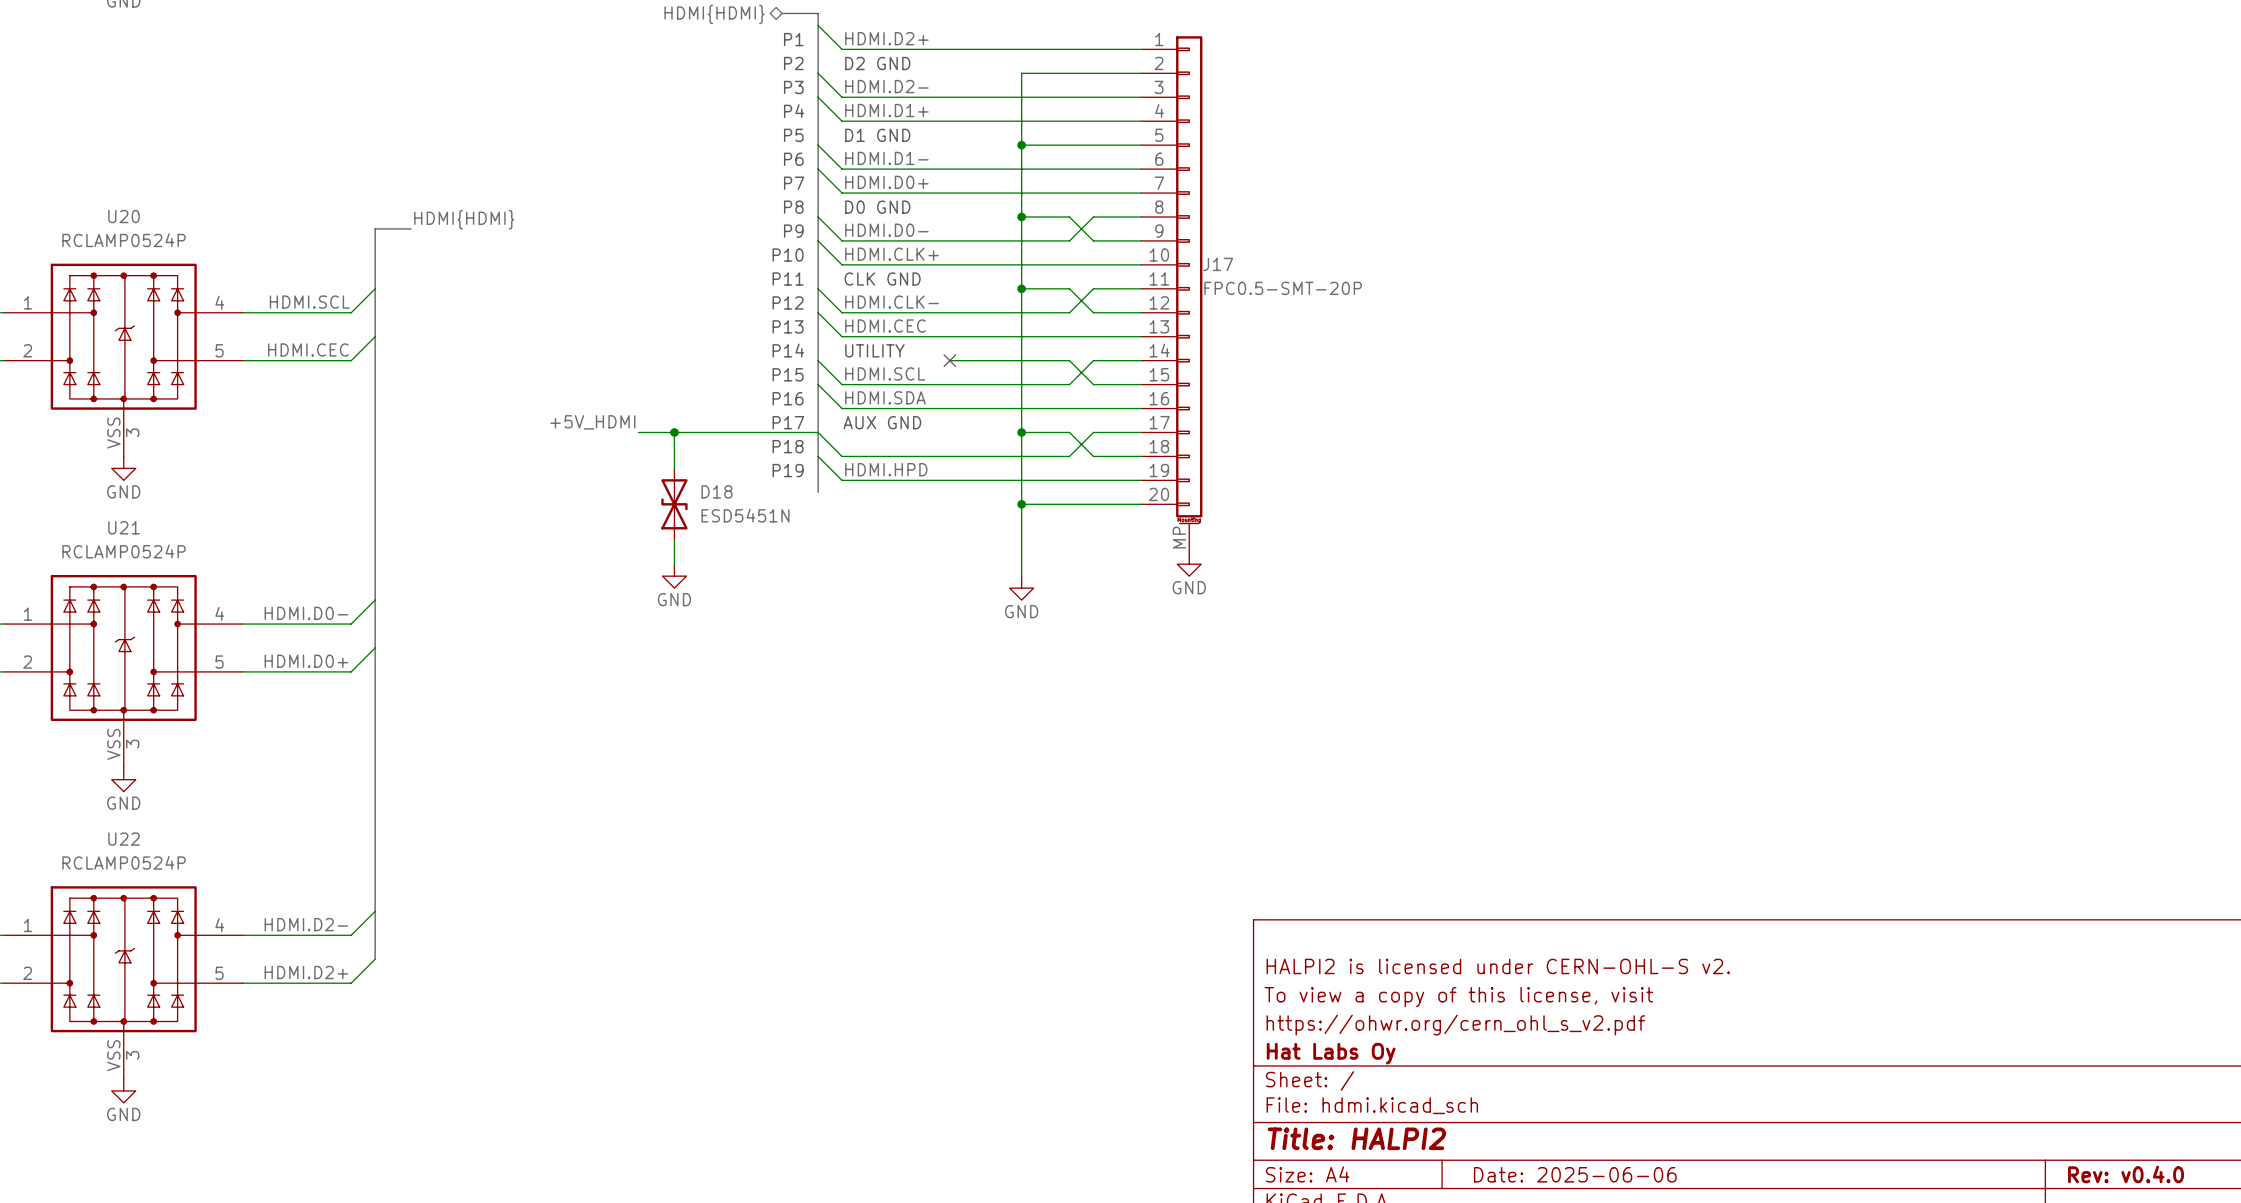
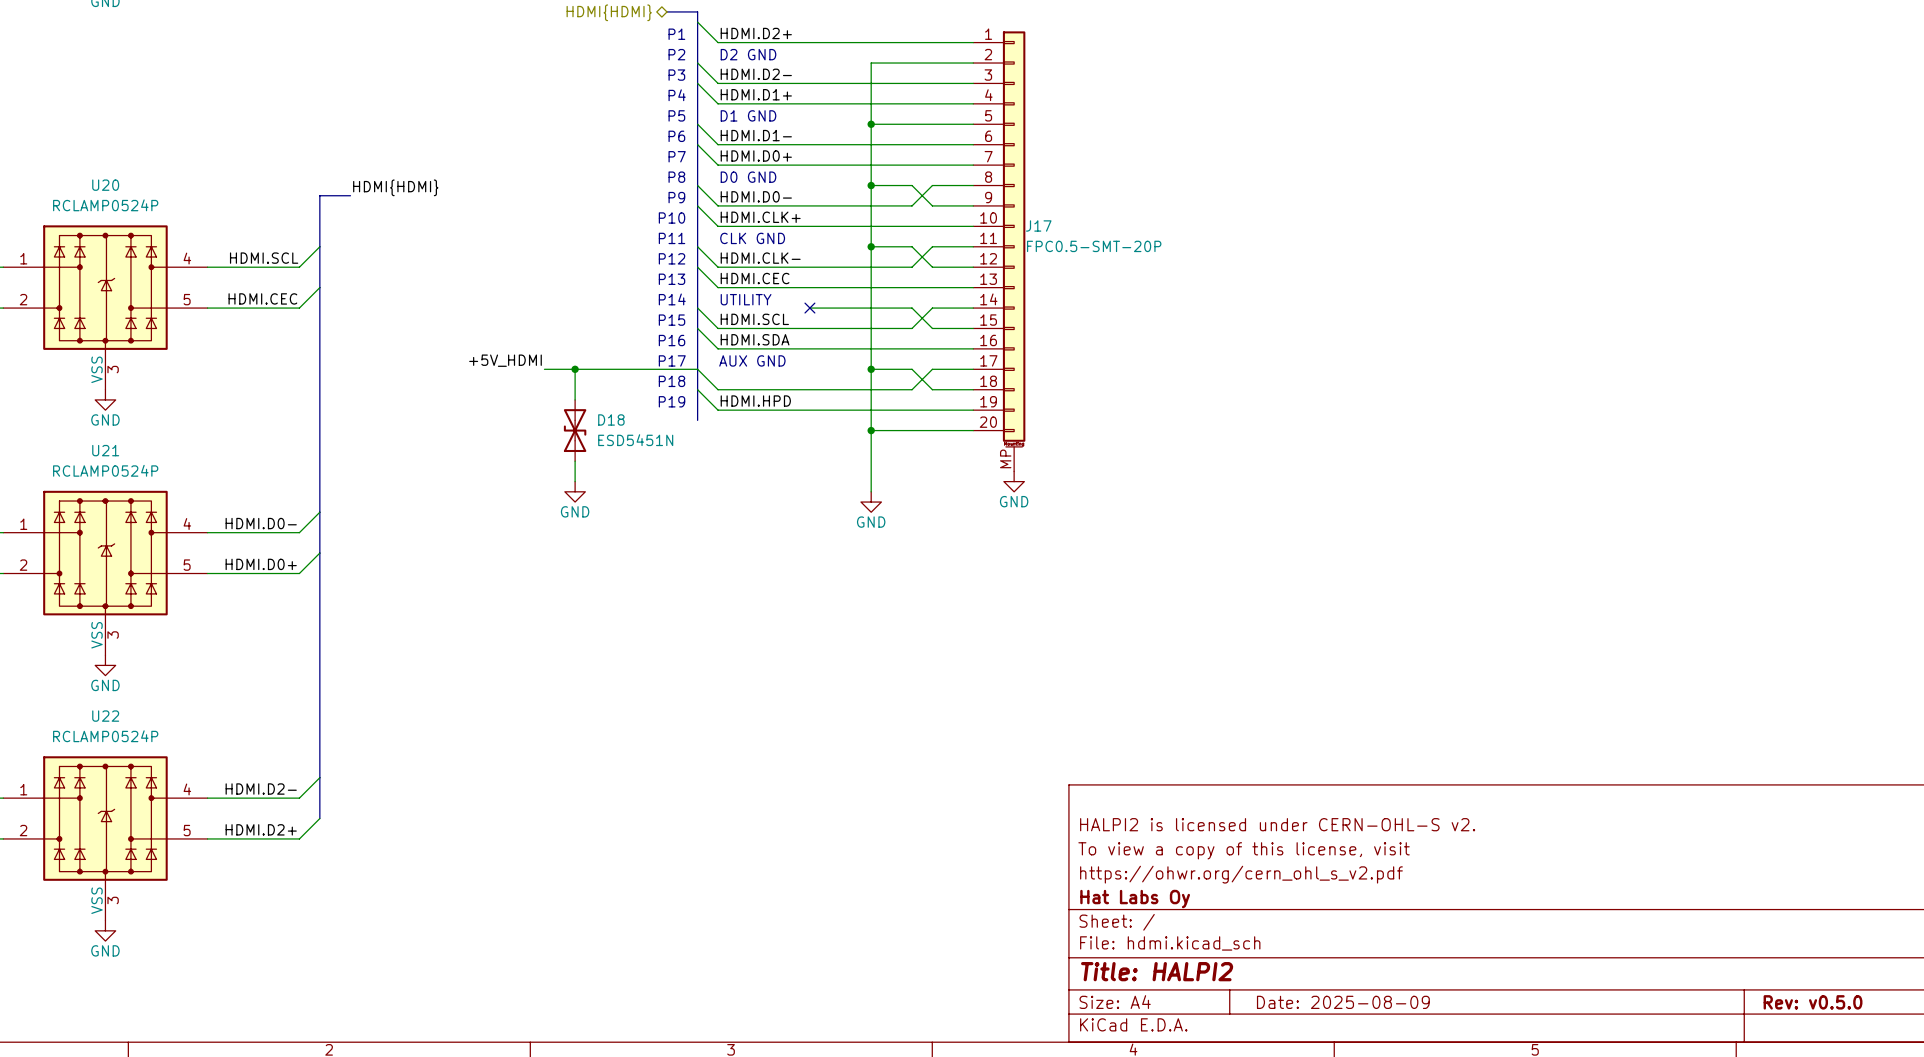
title block: Date: 2025-06-06 (1575, 1174) -> Date: 2025-08-09 (1343, 1002)
title block: Rev: v0.4.0 (2126, 1174) -> Rev: v0.5.0 (1813, 1002)

